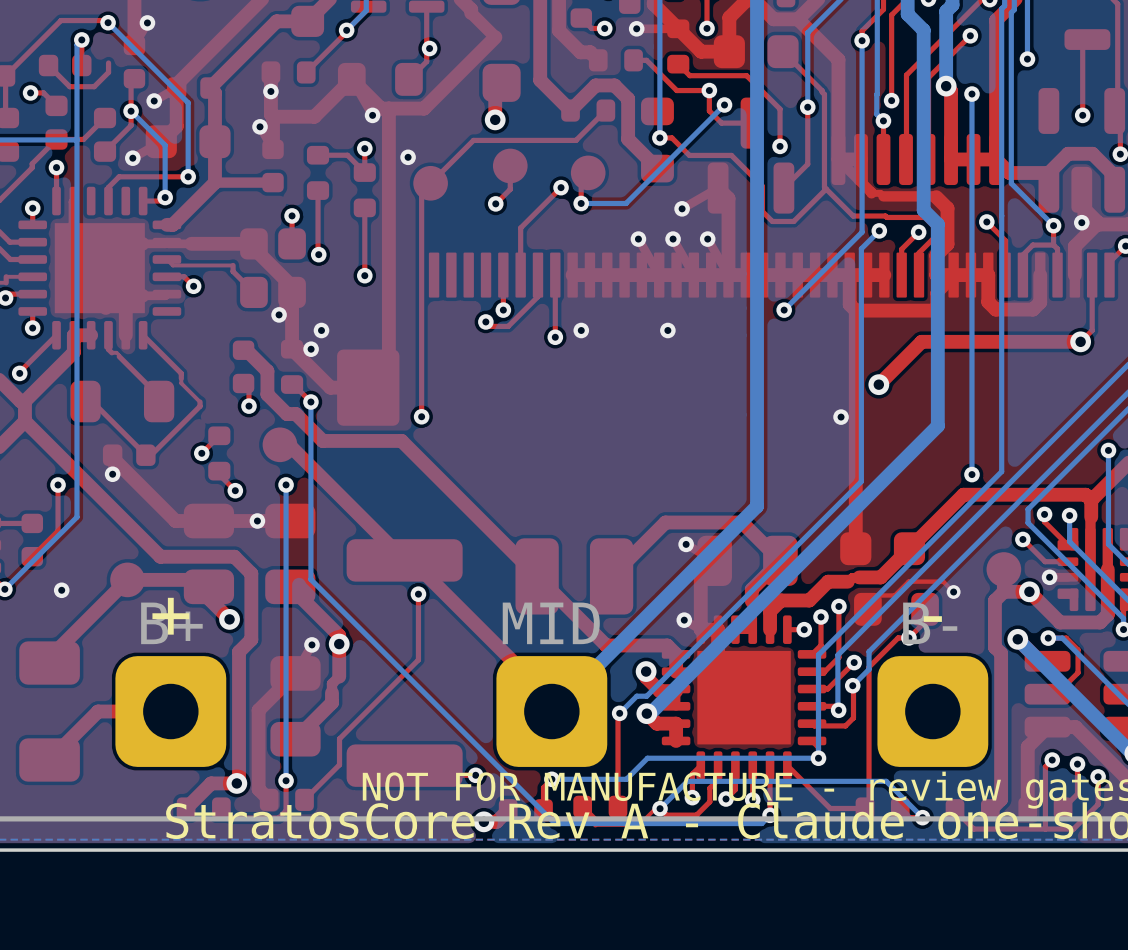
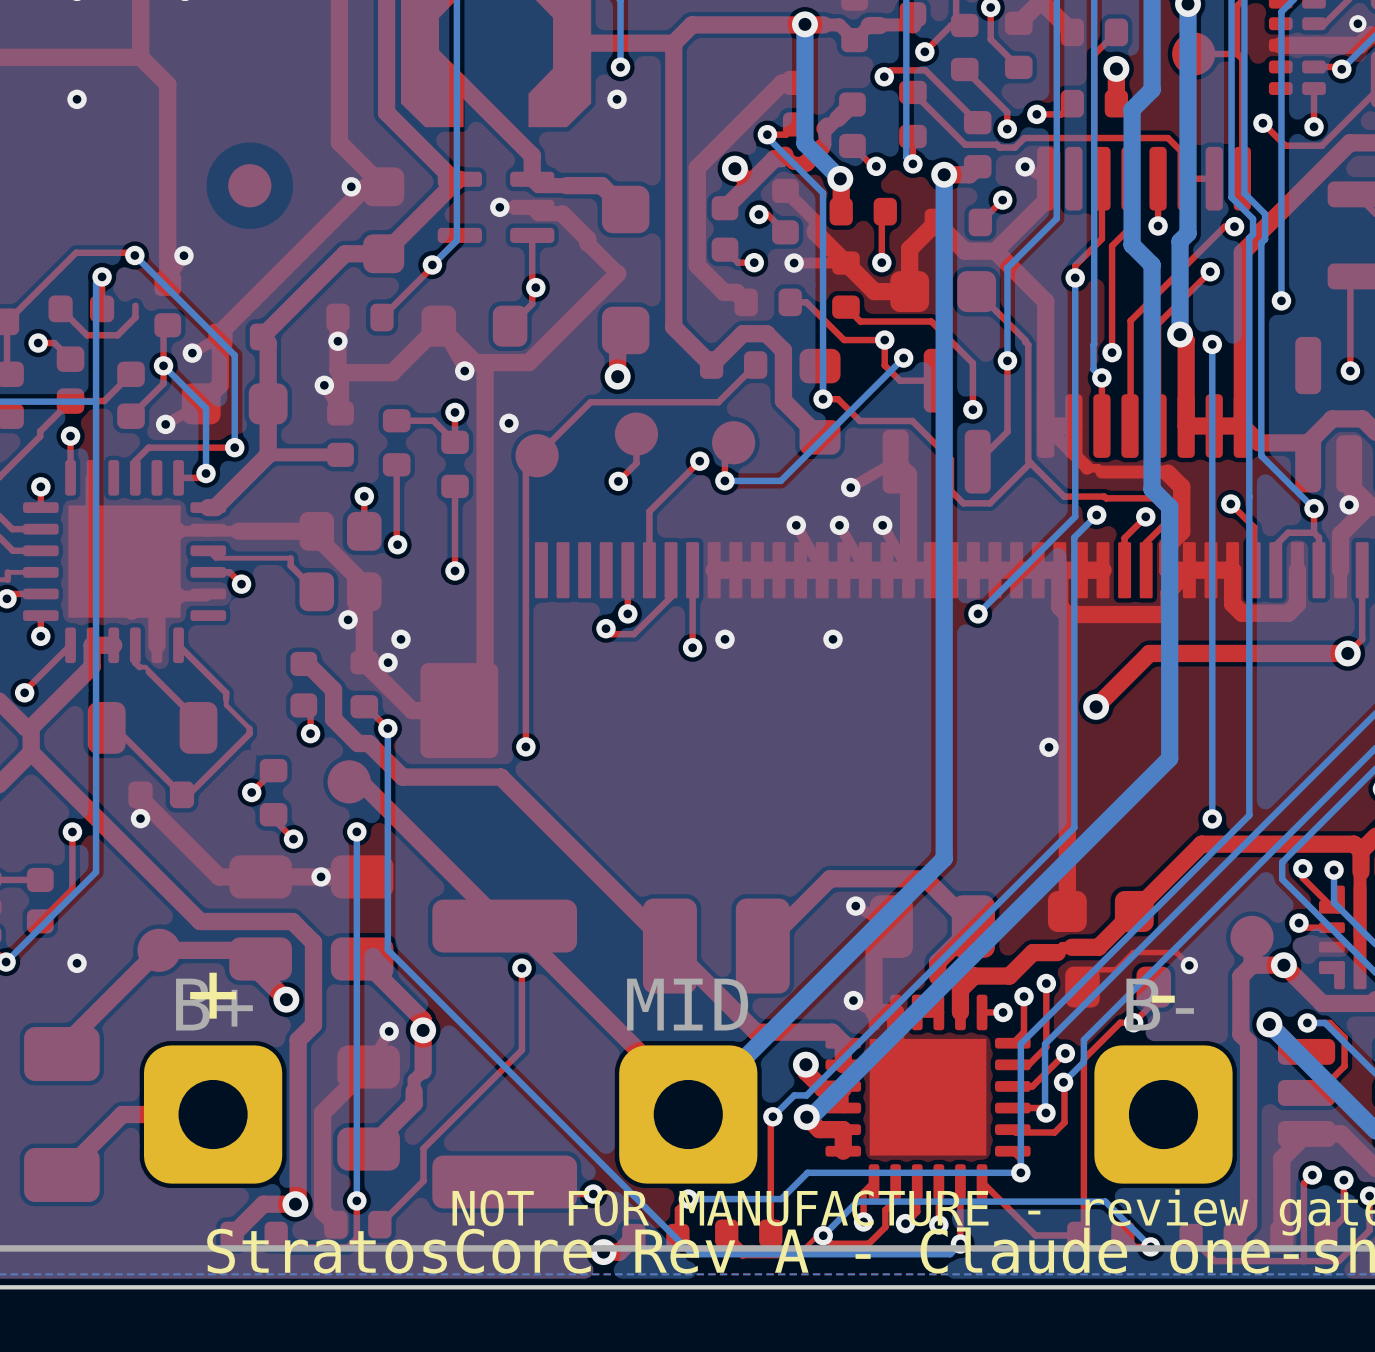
via: (1022, 539) -> none
via: none -> (1298, 923)
via: (1049, 577) -> none

